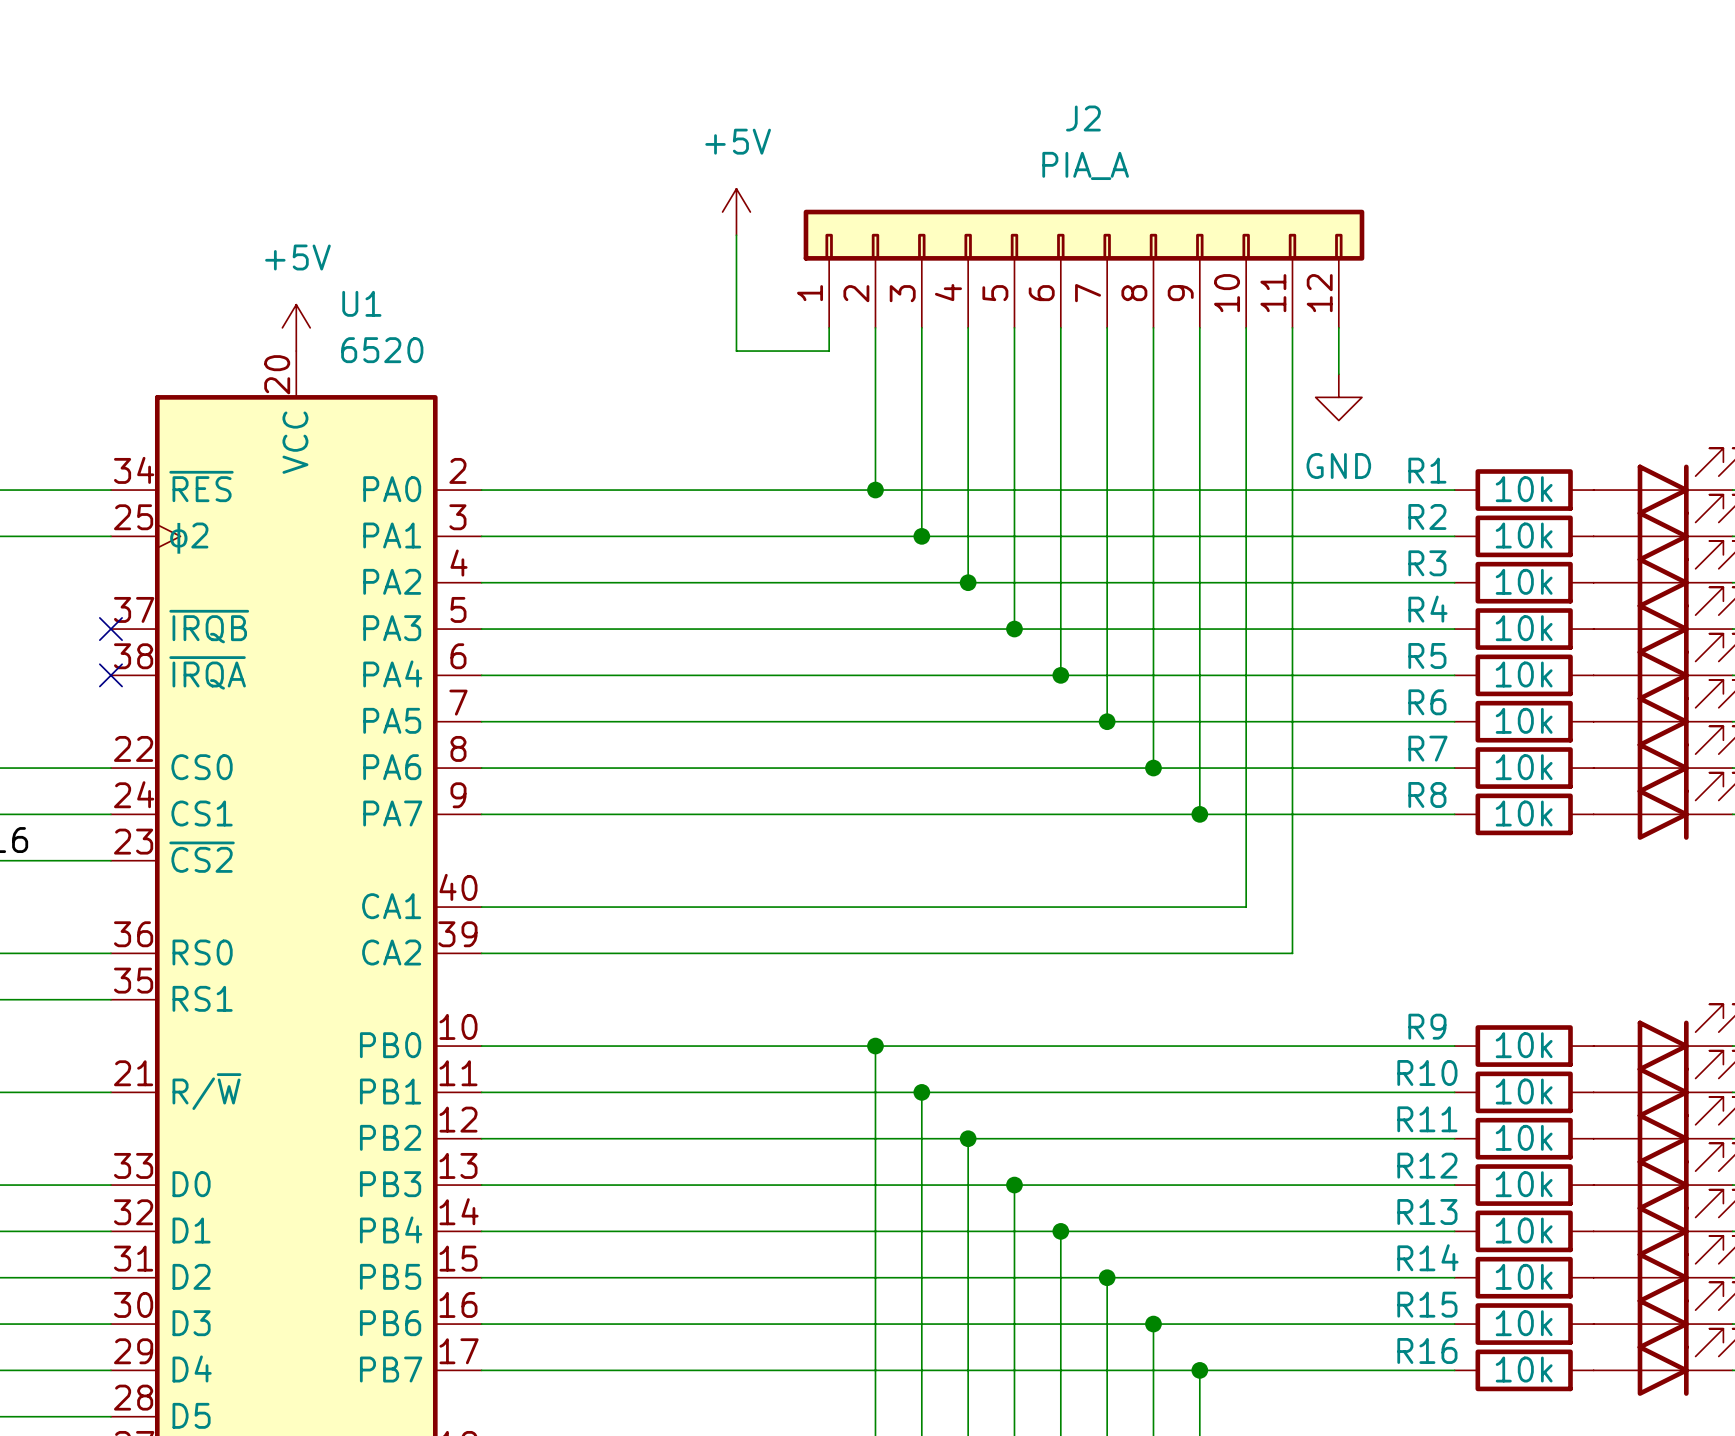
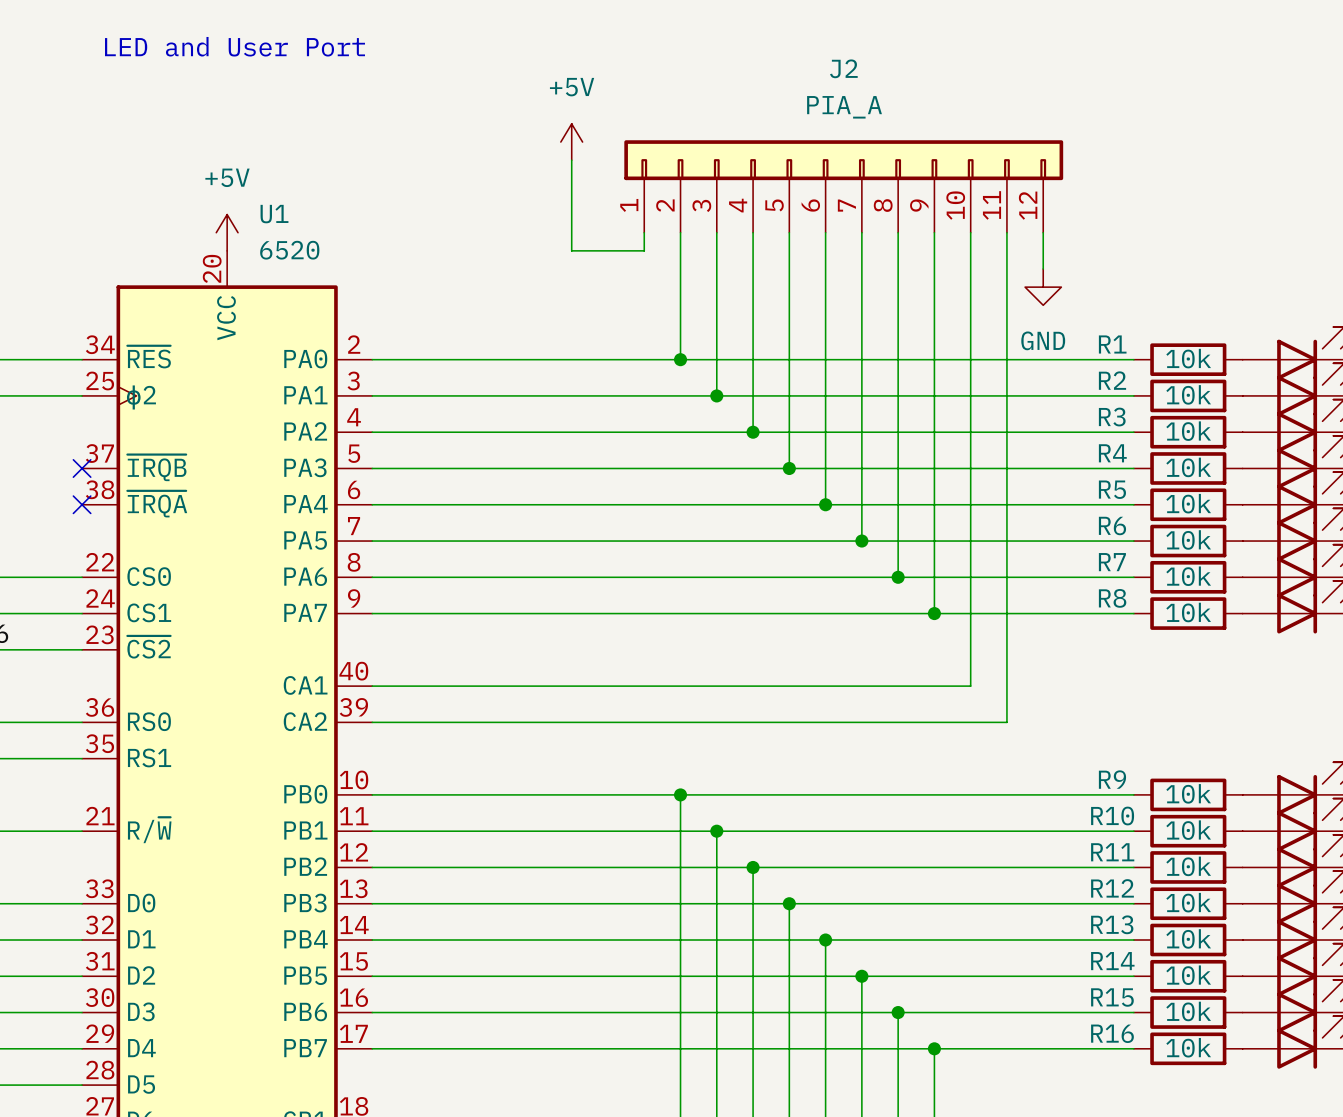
text: none -> LED and User Port (235, 46)

